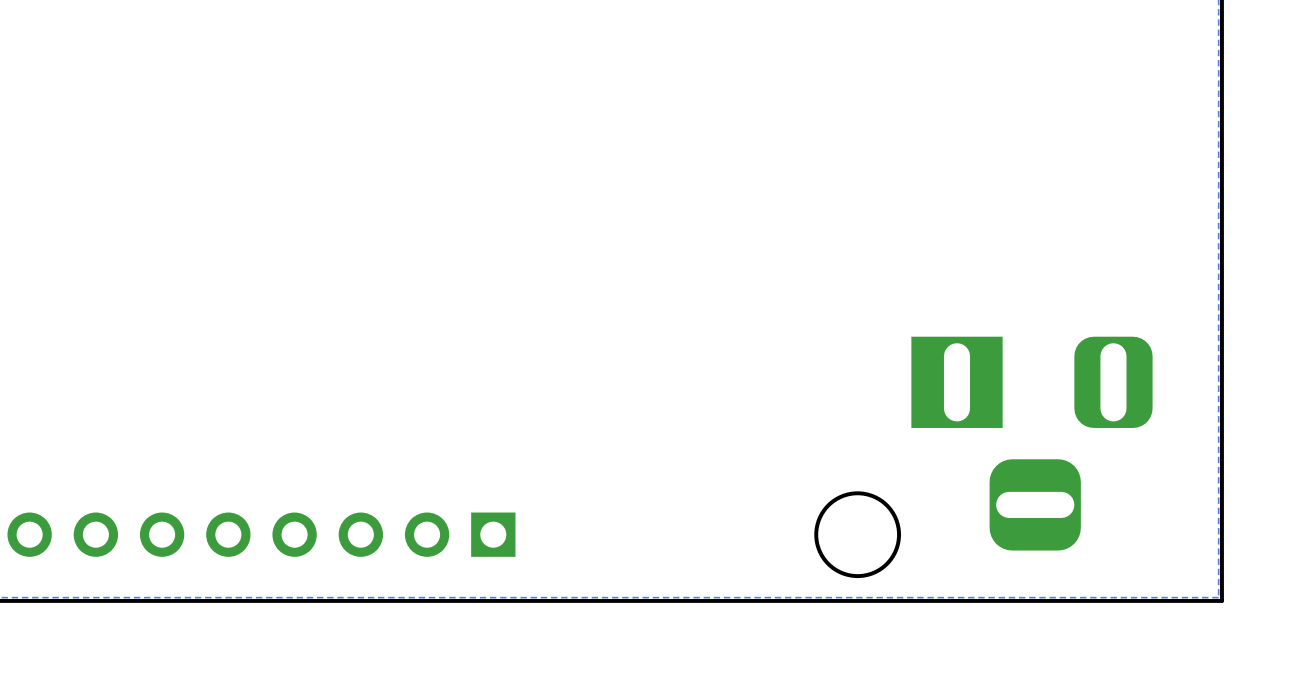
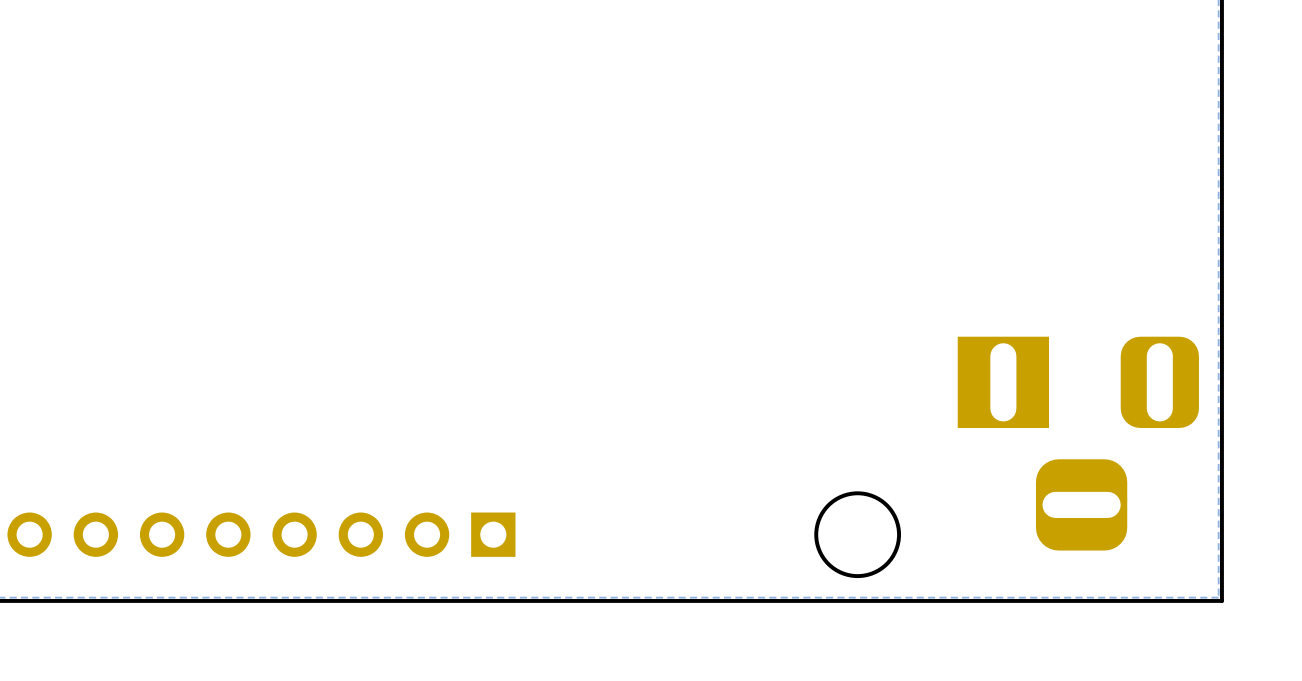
part position: (1031, 443) -> (1078, 443)

